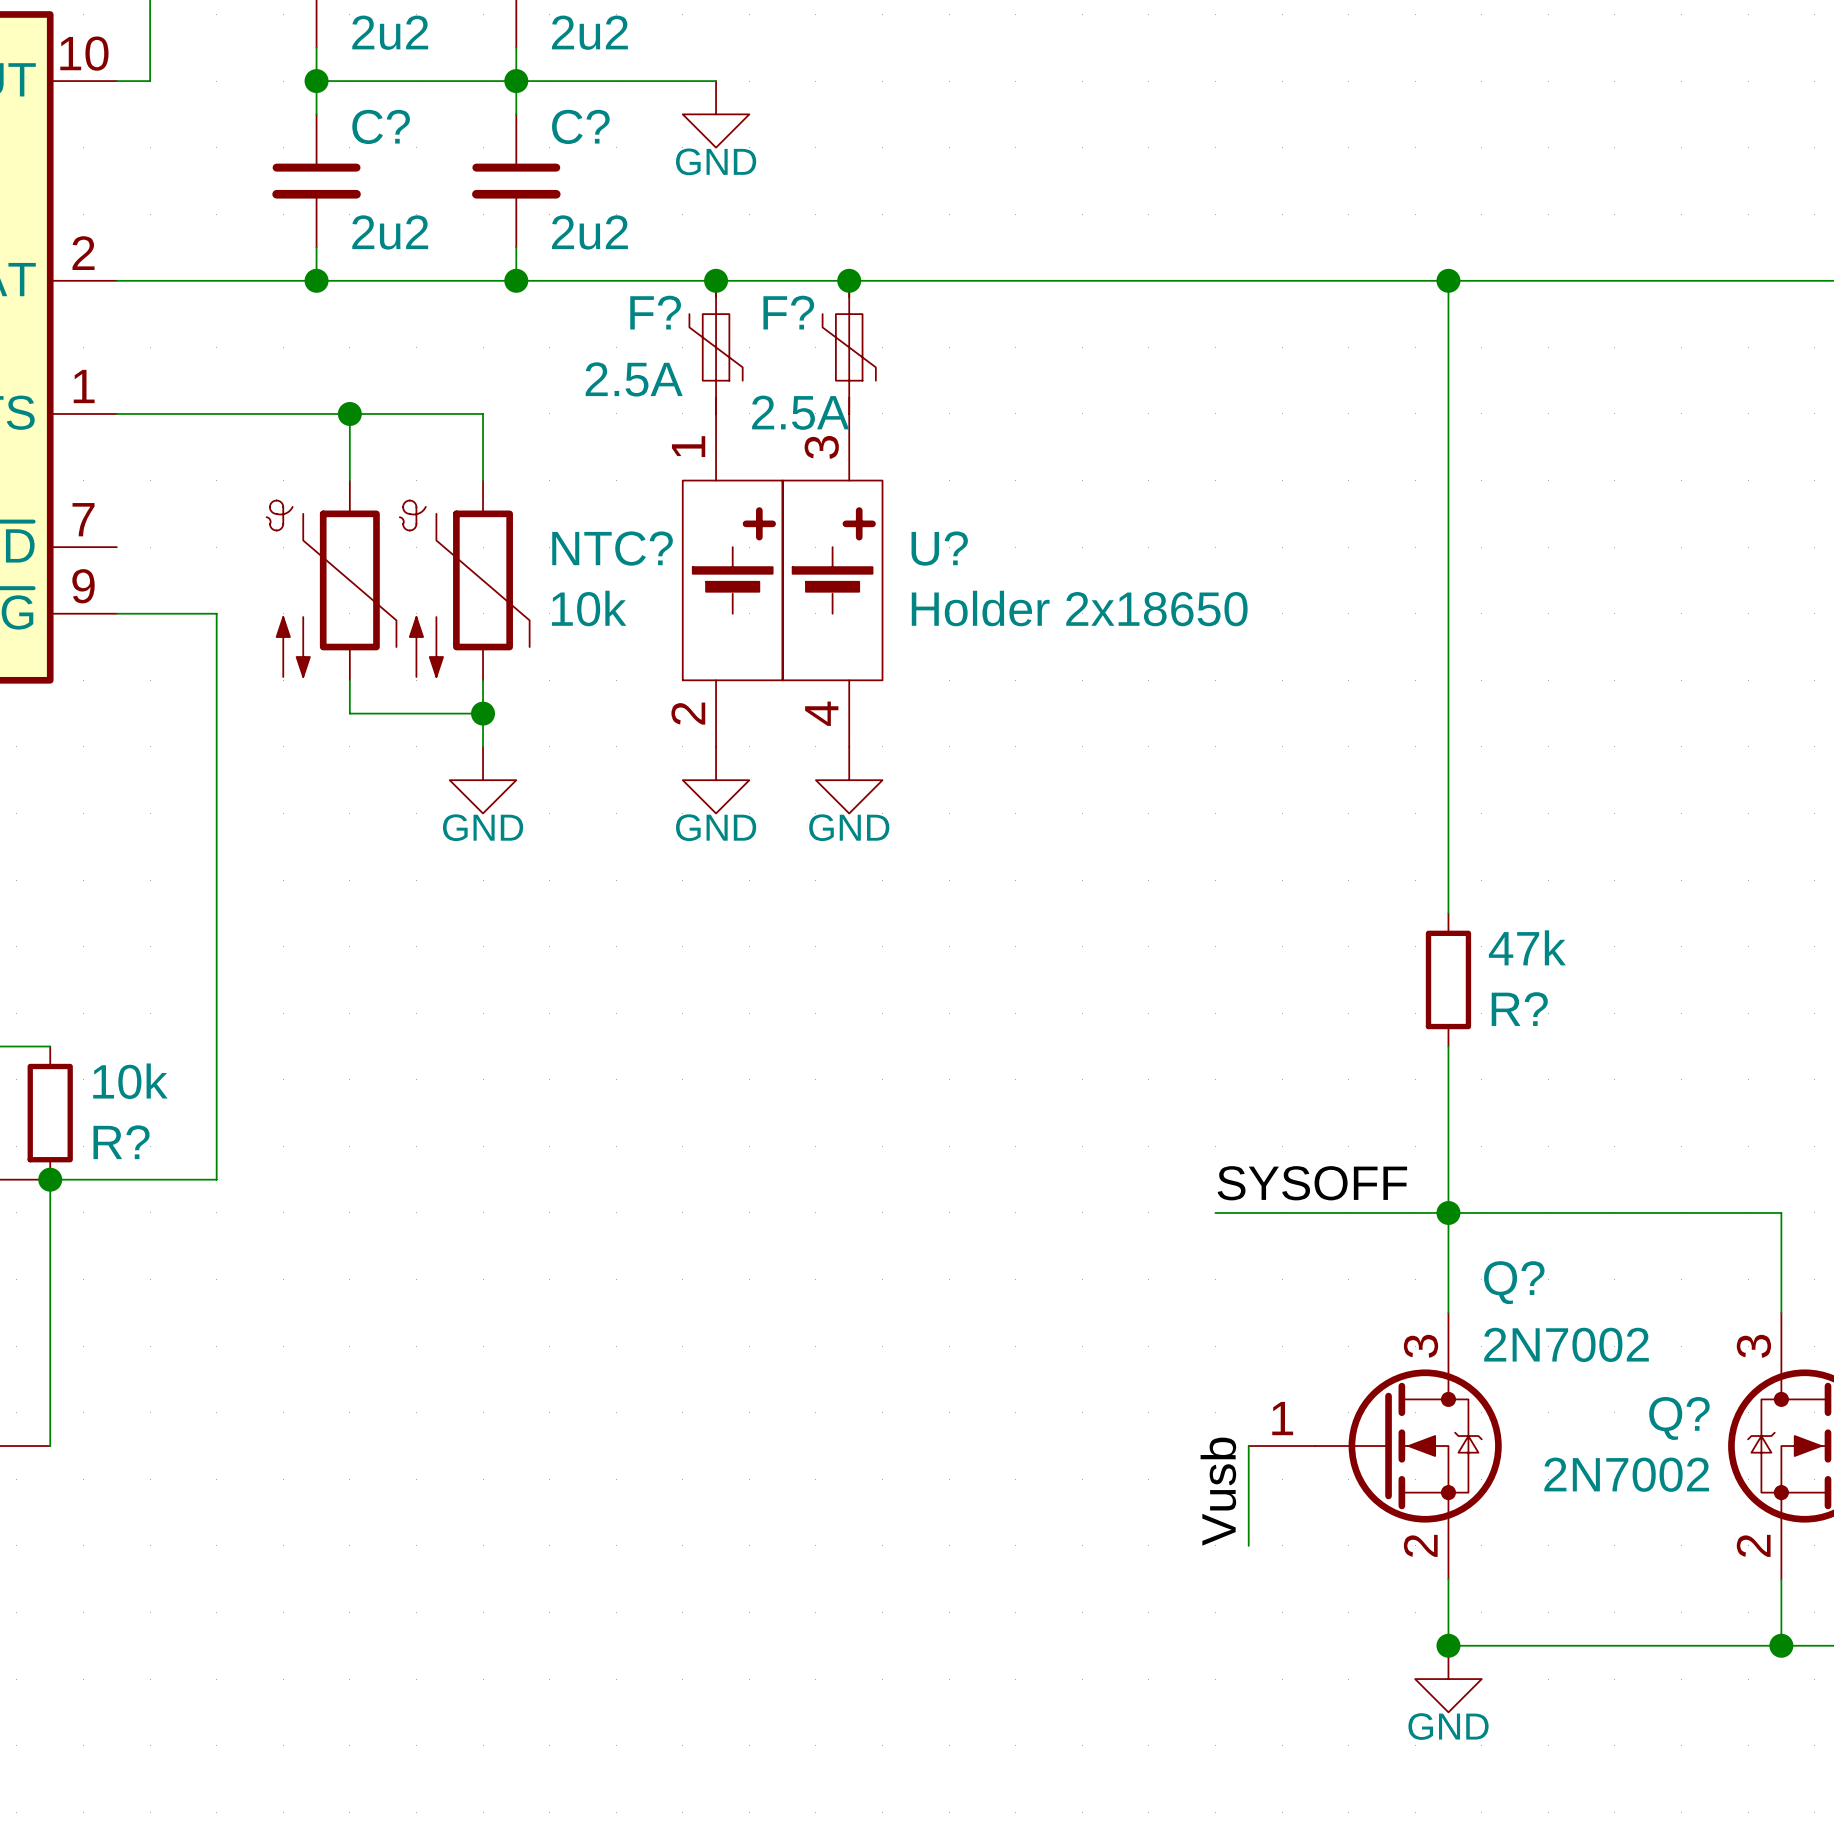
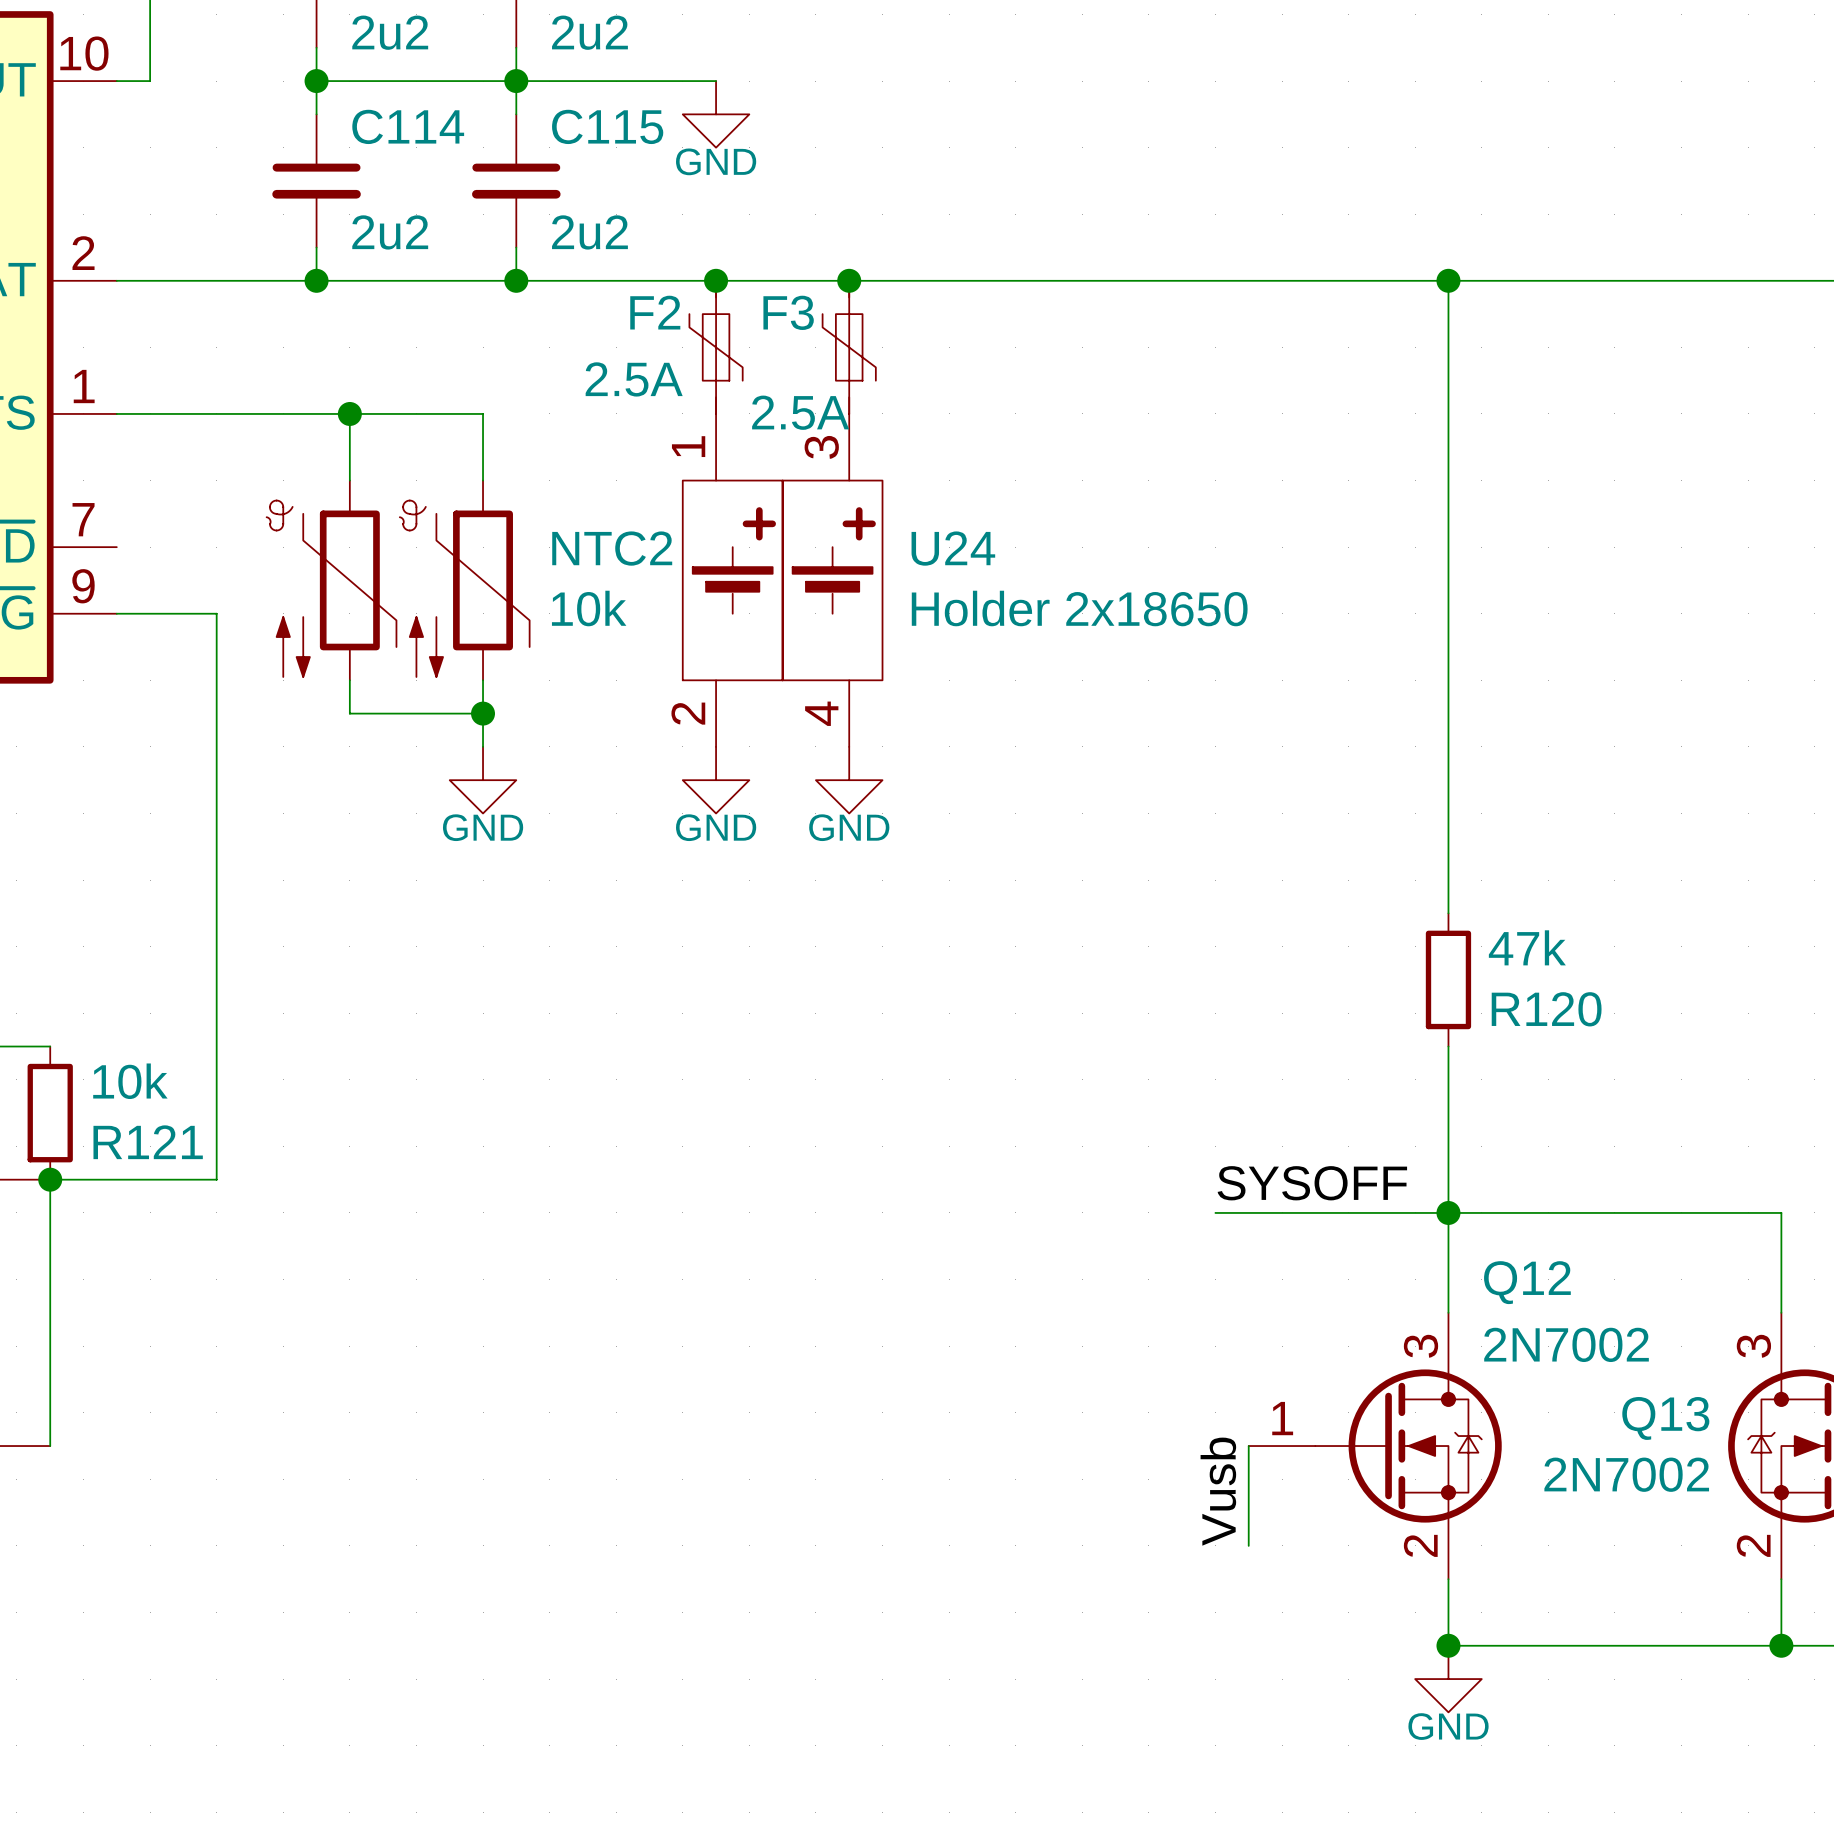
C? name: C? (381, 126) -> C114 (408, 126)
C? name: C? (580, 126) -> C115 (607, 126)
F? name: F? (655, 312) -> F2 (655, 312)
F? name: F? (788, 312) -> F3 (788, 312)
NTC? name: NTC? (612, 548) -> NTC2 (612, 548)
U? name: U? (939, 548) -> U24 (953, 548)
R? name: R? (1519, 1009) -> R120 (1546, 1009)
R? name: R? (121, 1142) -> R121 (148, 1142)
Q? name: Q? (1514, 1282) -> Q12 (1527, 1282)
Q? name: Q? (1679, 1418) -> Q13 (1665, 1418)

